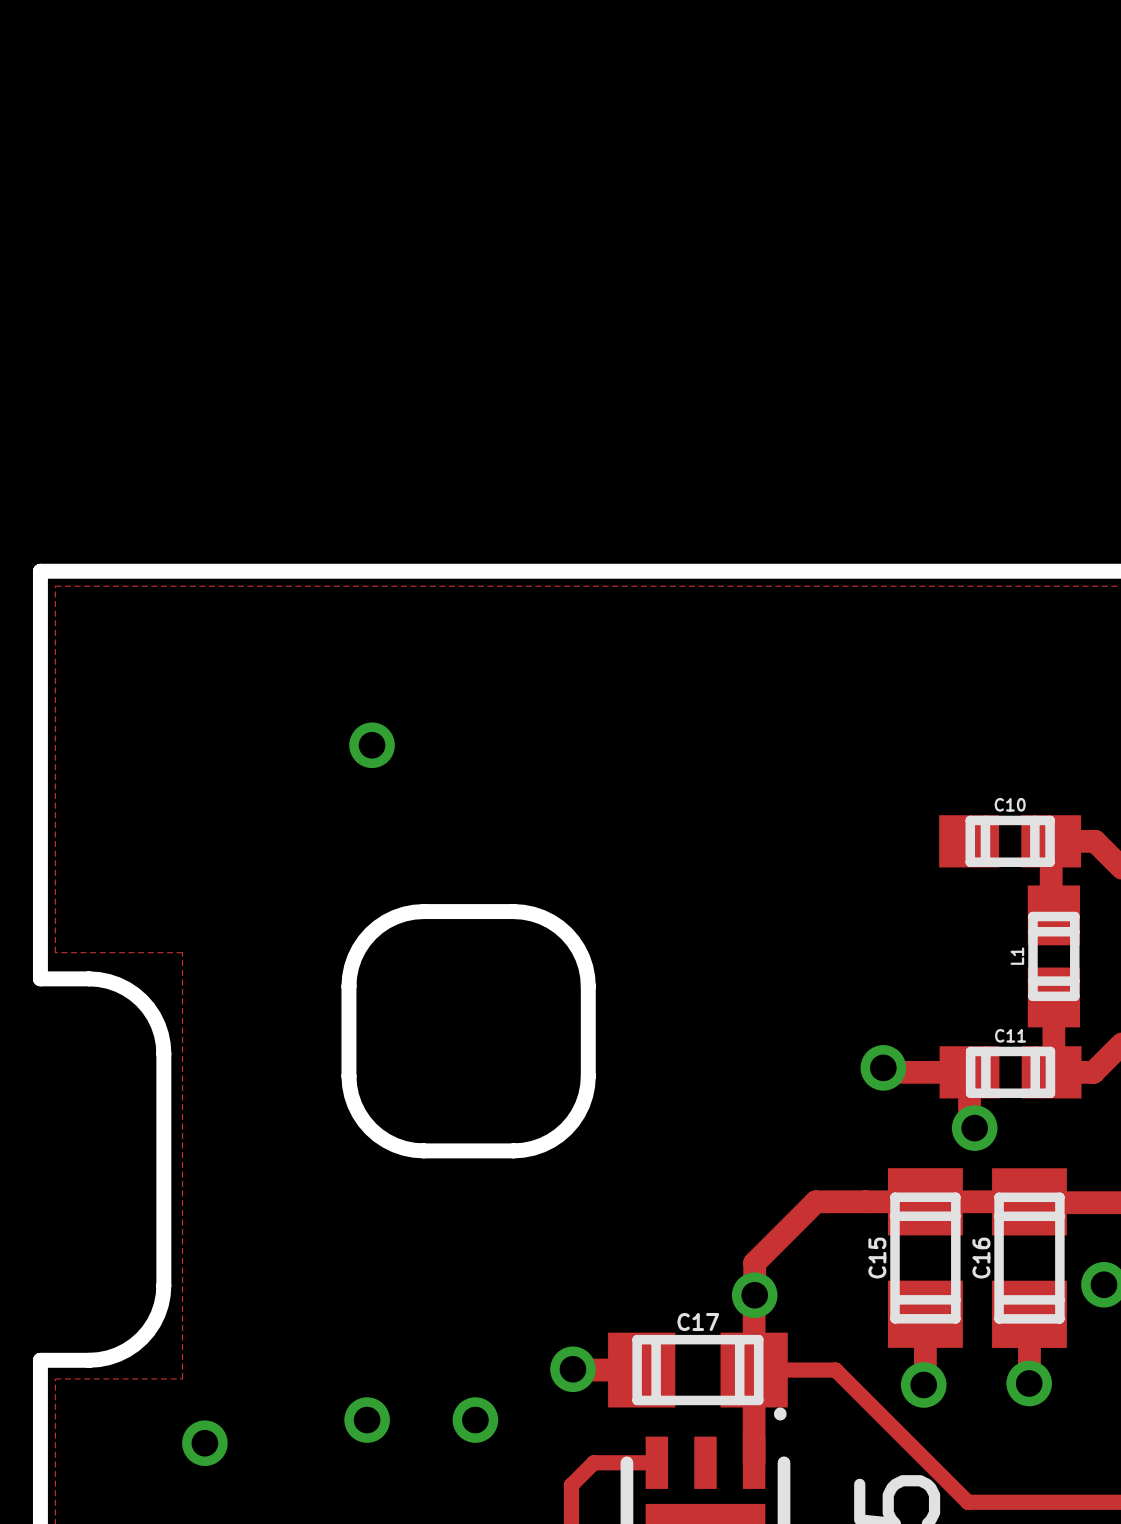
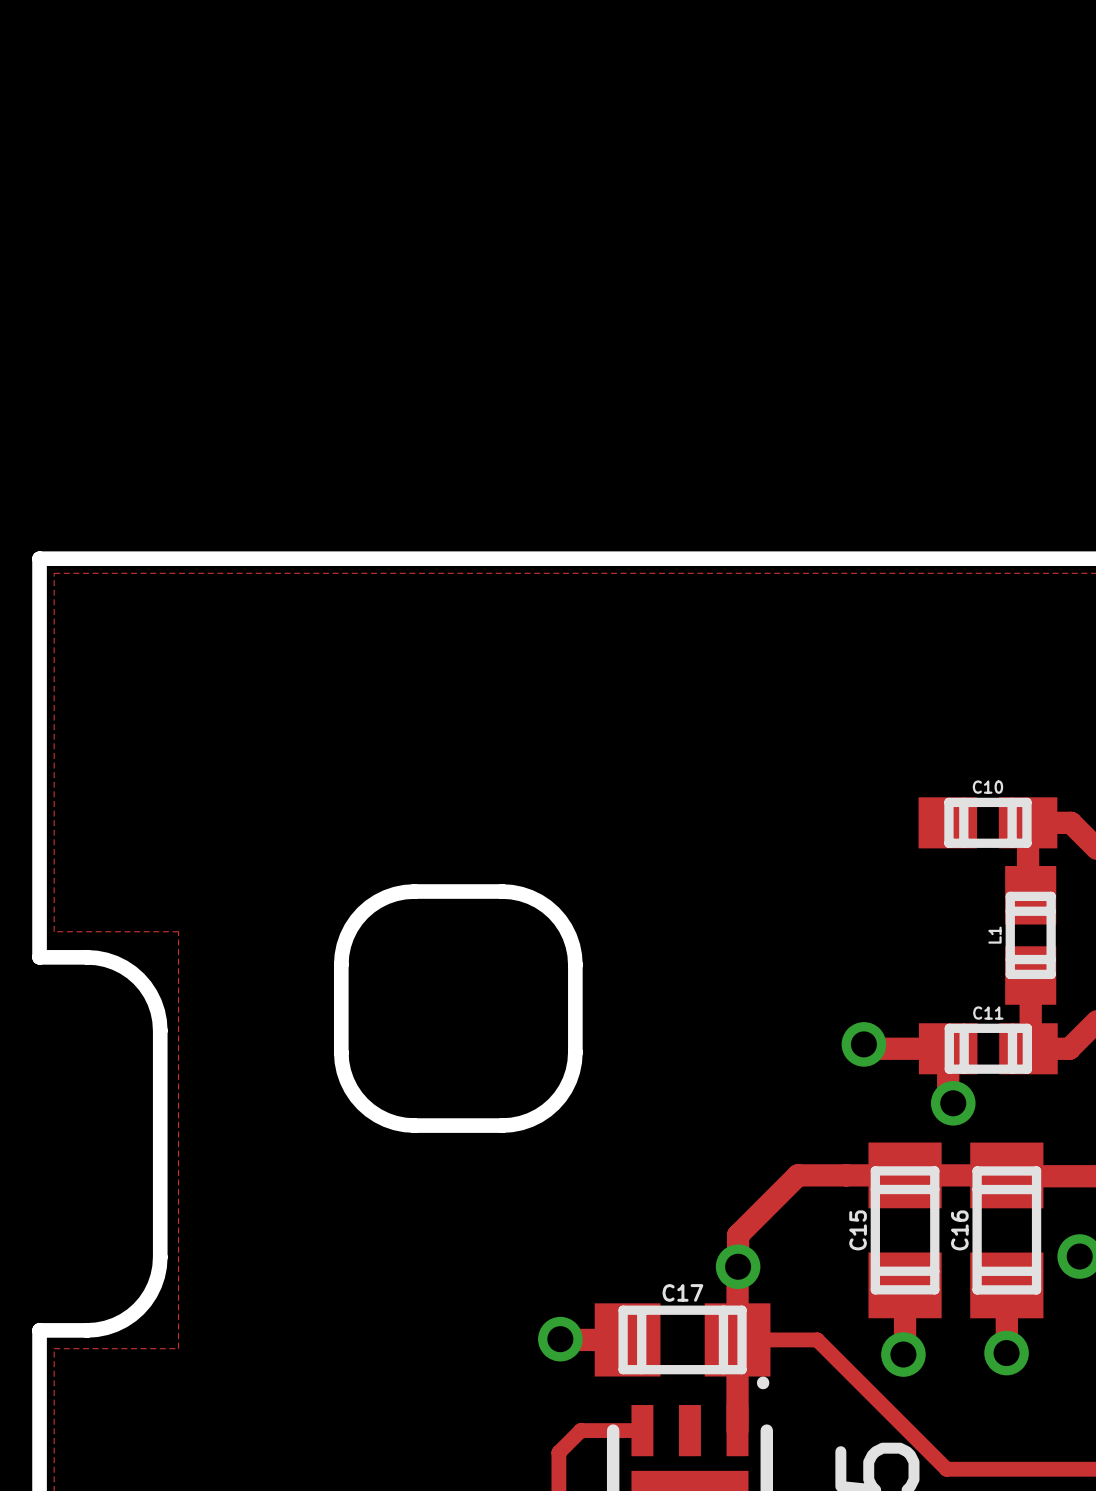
via: (372, 745) -> none
via: (367, 1420) -> none
via: (475, 1420) -> none
via: (204, 1443) -> none

